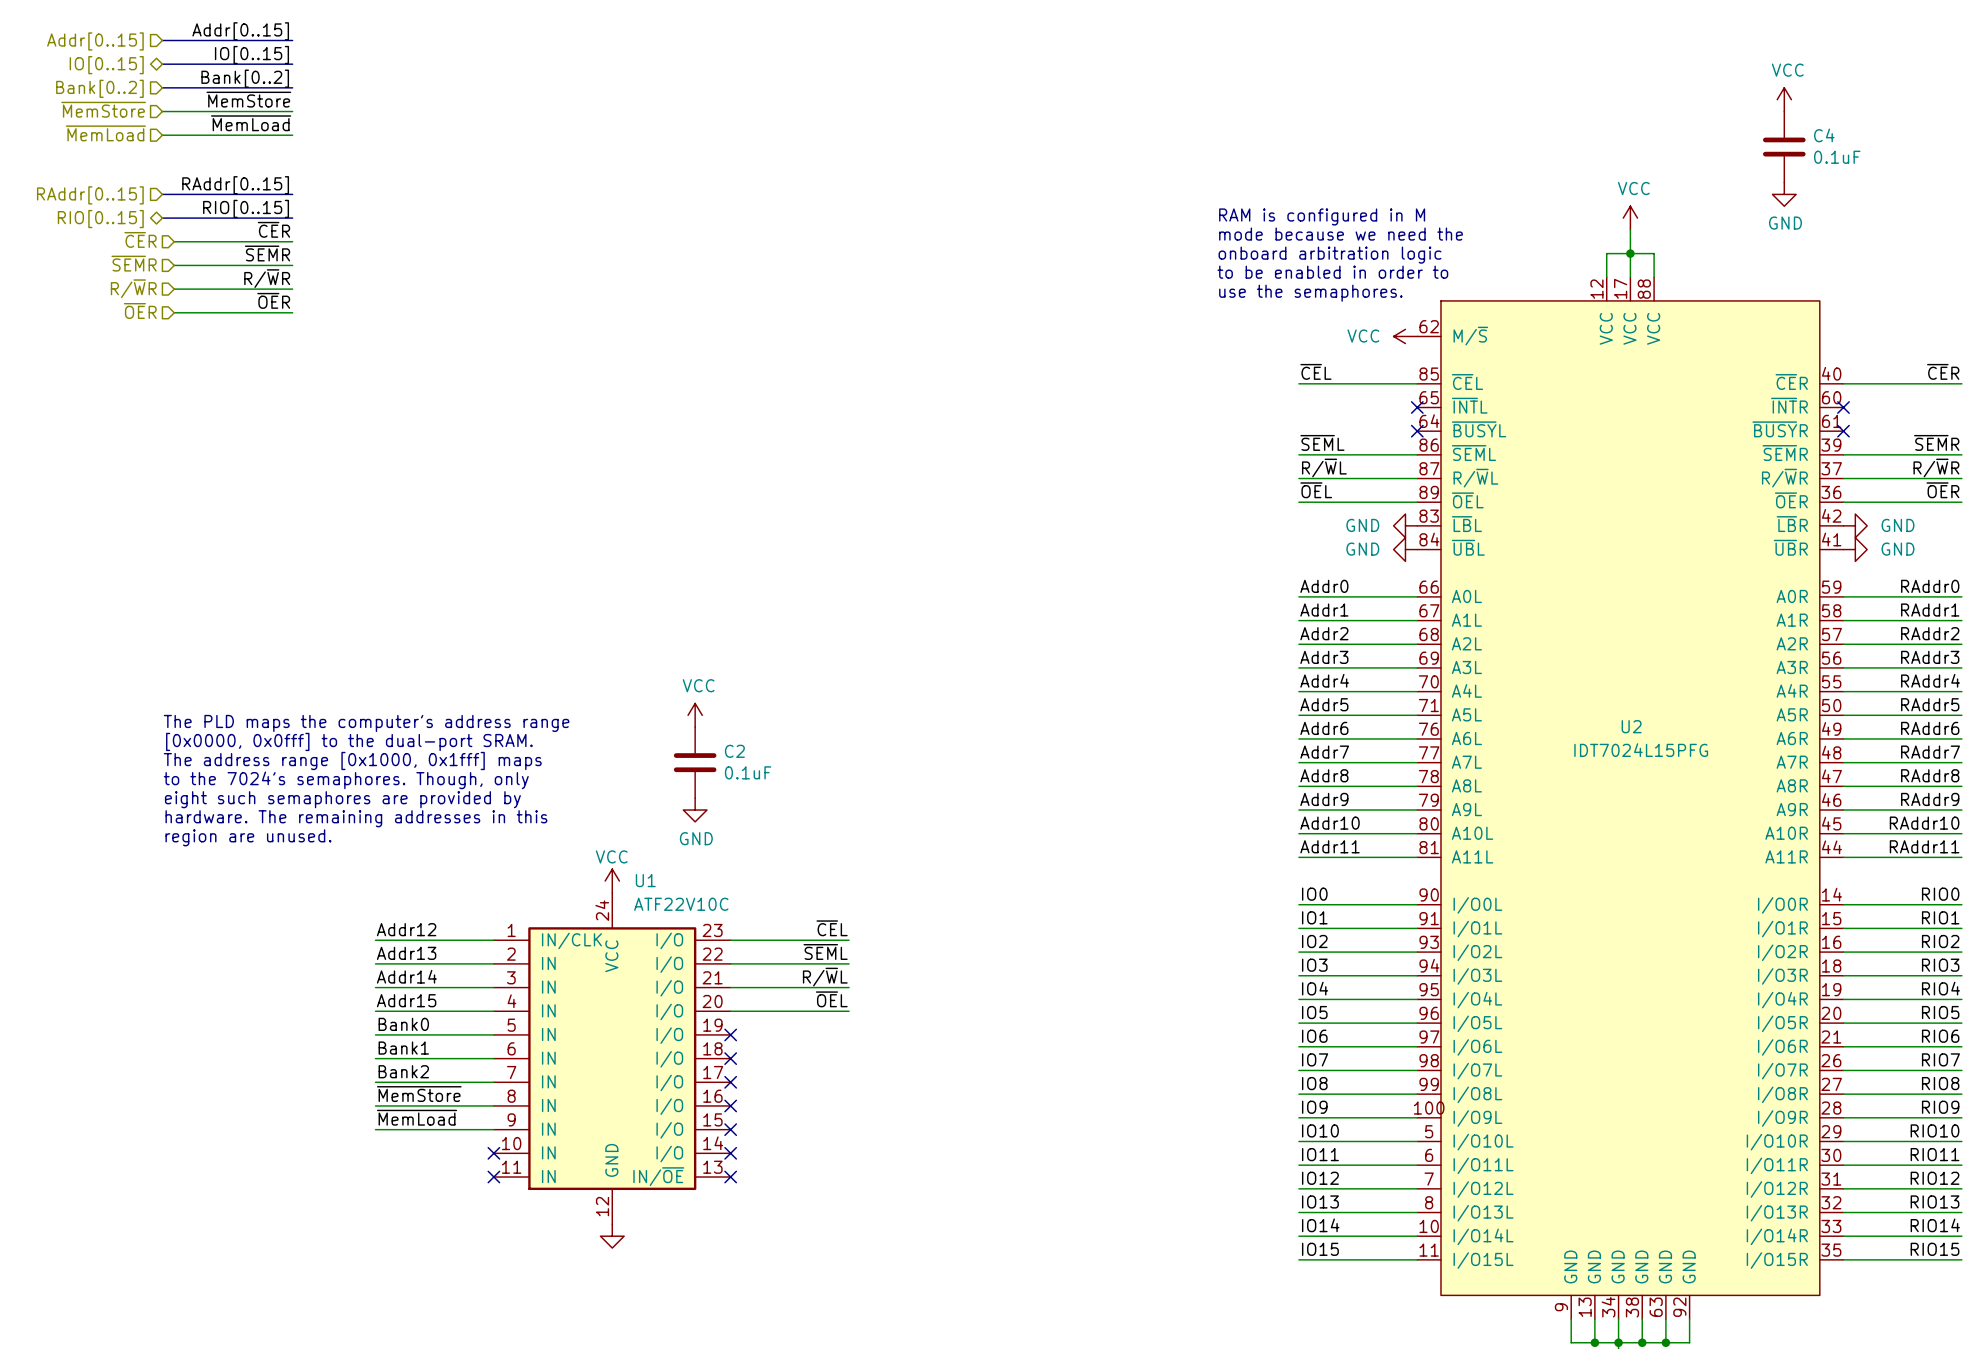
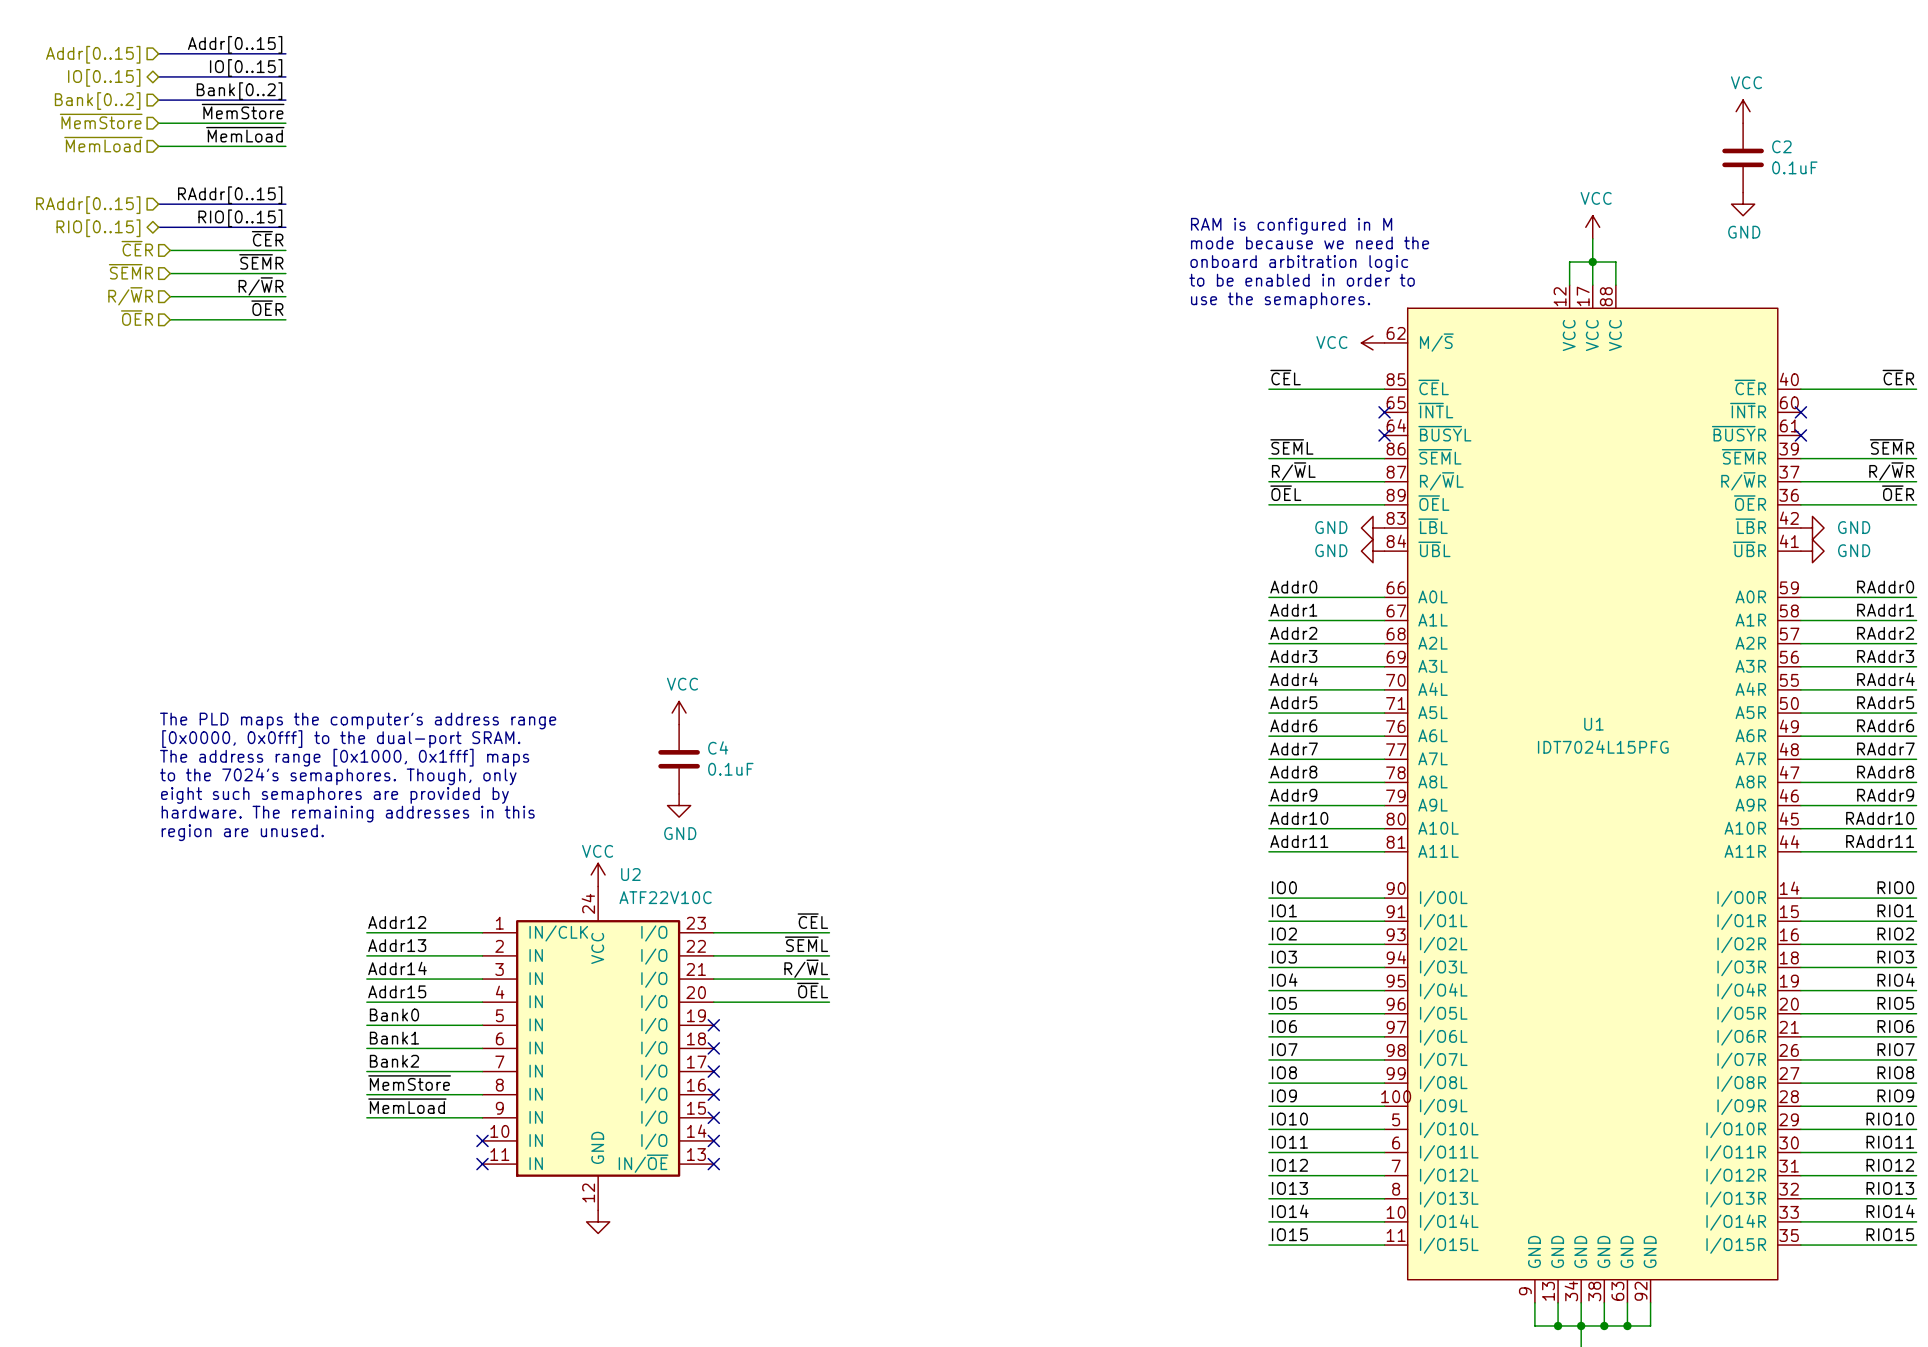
C4 name: C4 (1824, 135) -> C2 (1781, 146)
U2 name: U2 (1631, 726) -> U1 (1593, 724)
C2 name: C2 (734, 751) -> C4 (718, 747)
U1 name: U1 (645, 880) -> U2 (630, 874)

